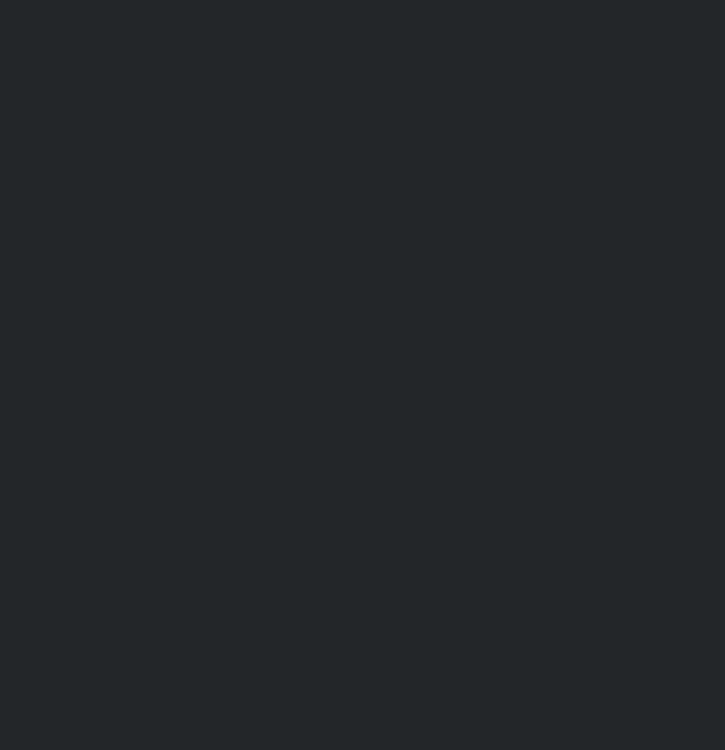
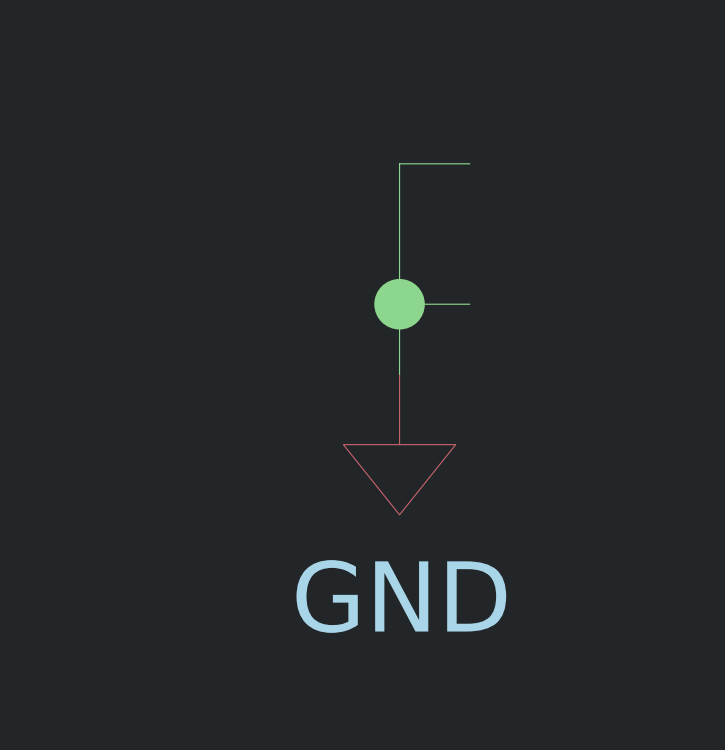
wire: none -> (469, 163) (399, 163) (399, 374)
wire: none -> (399, 304) (469, 304)
junction: none -> (399, 304)
power symbol: none -> GND (399, 444)

